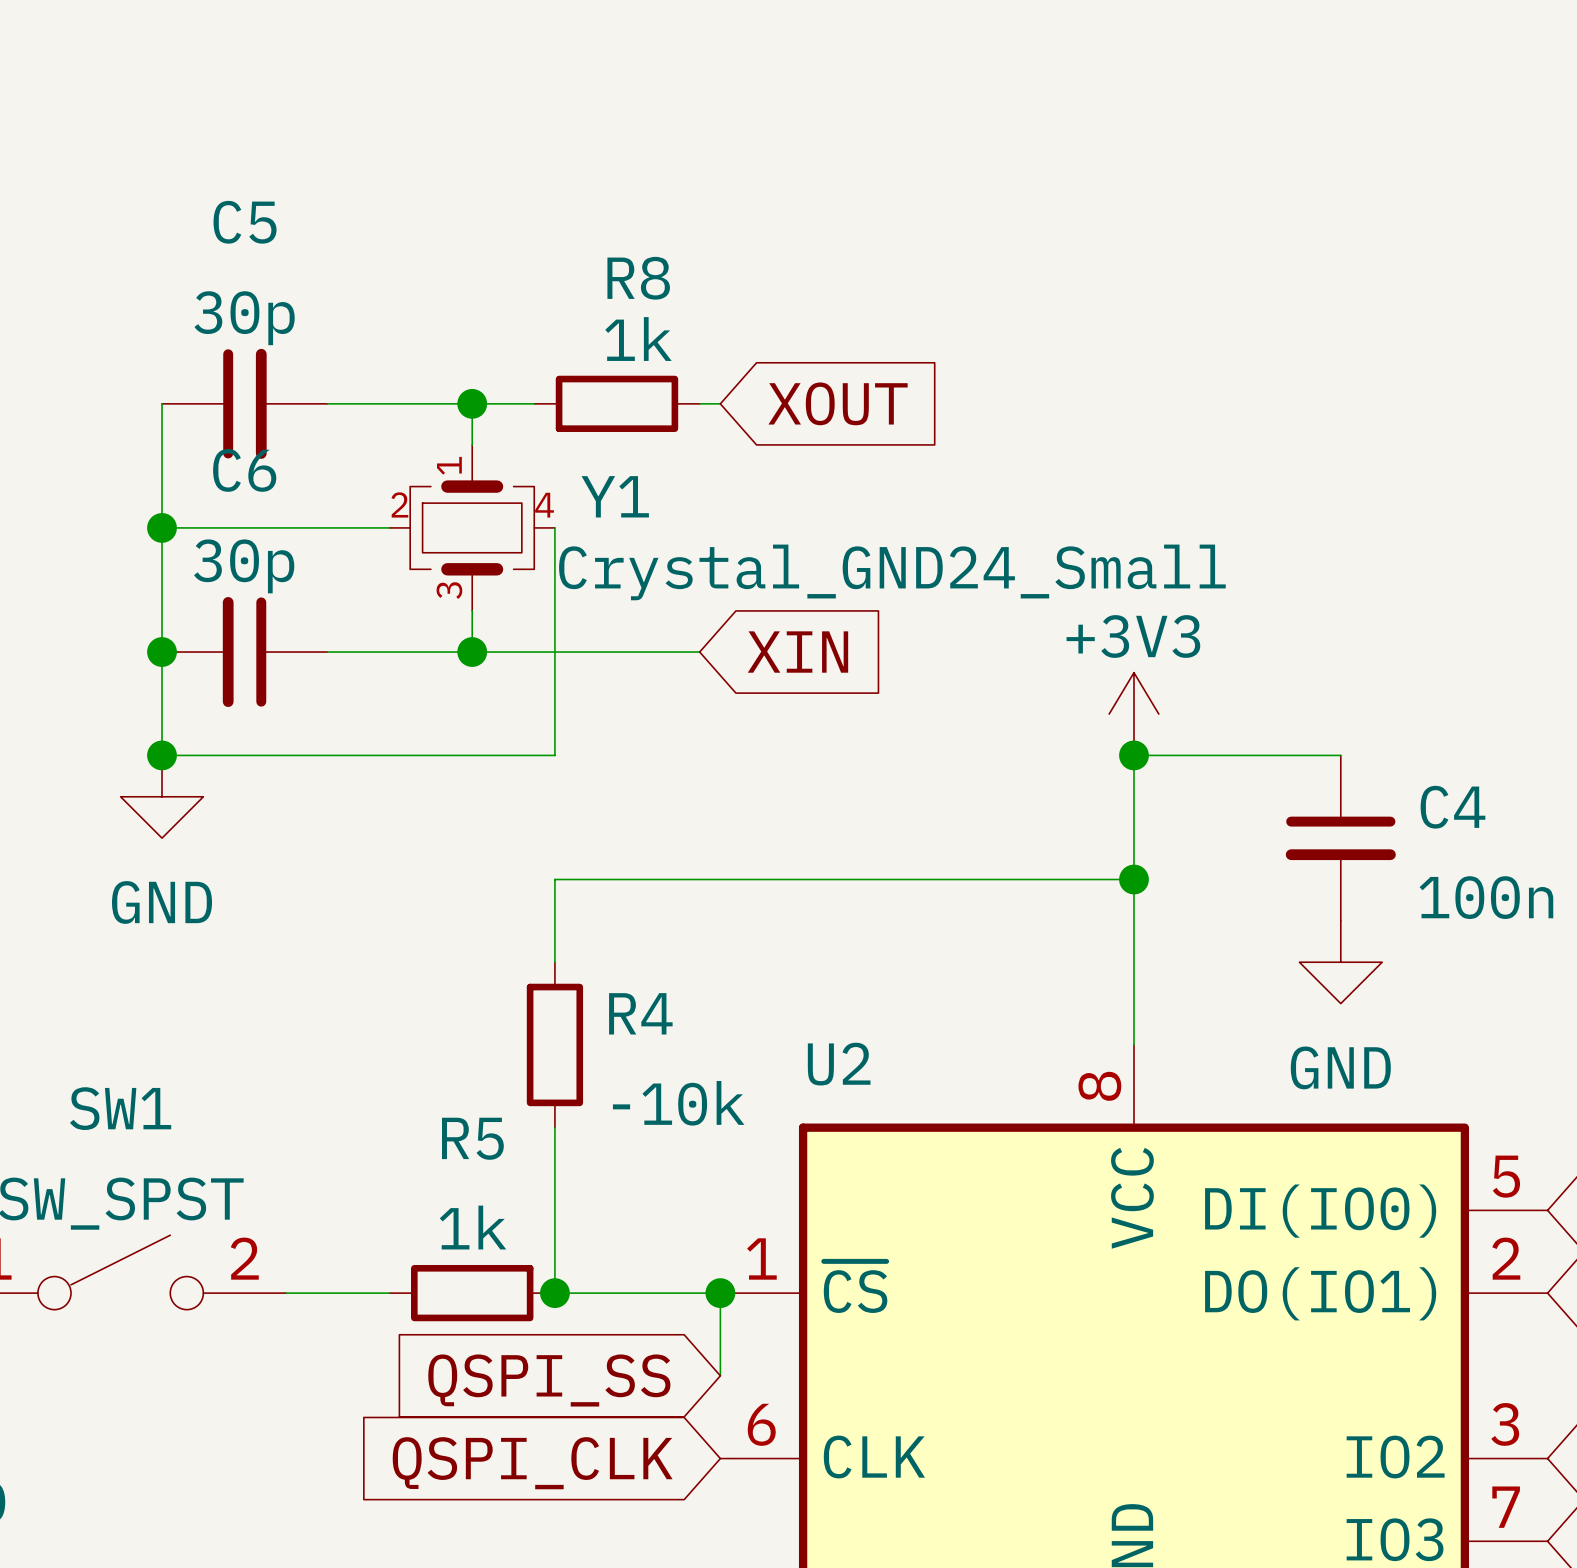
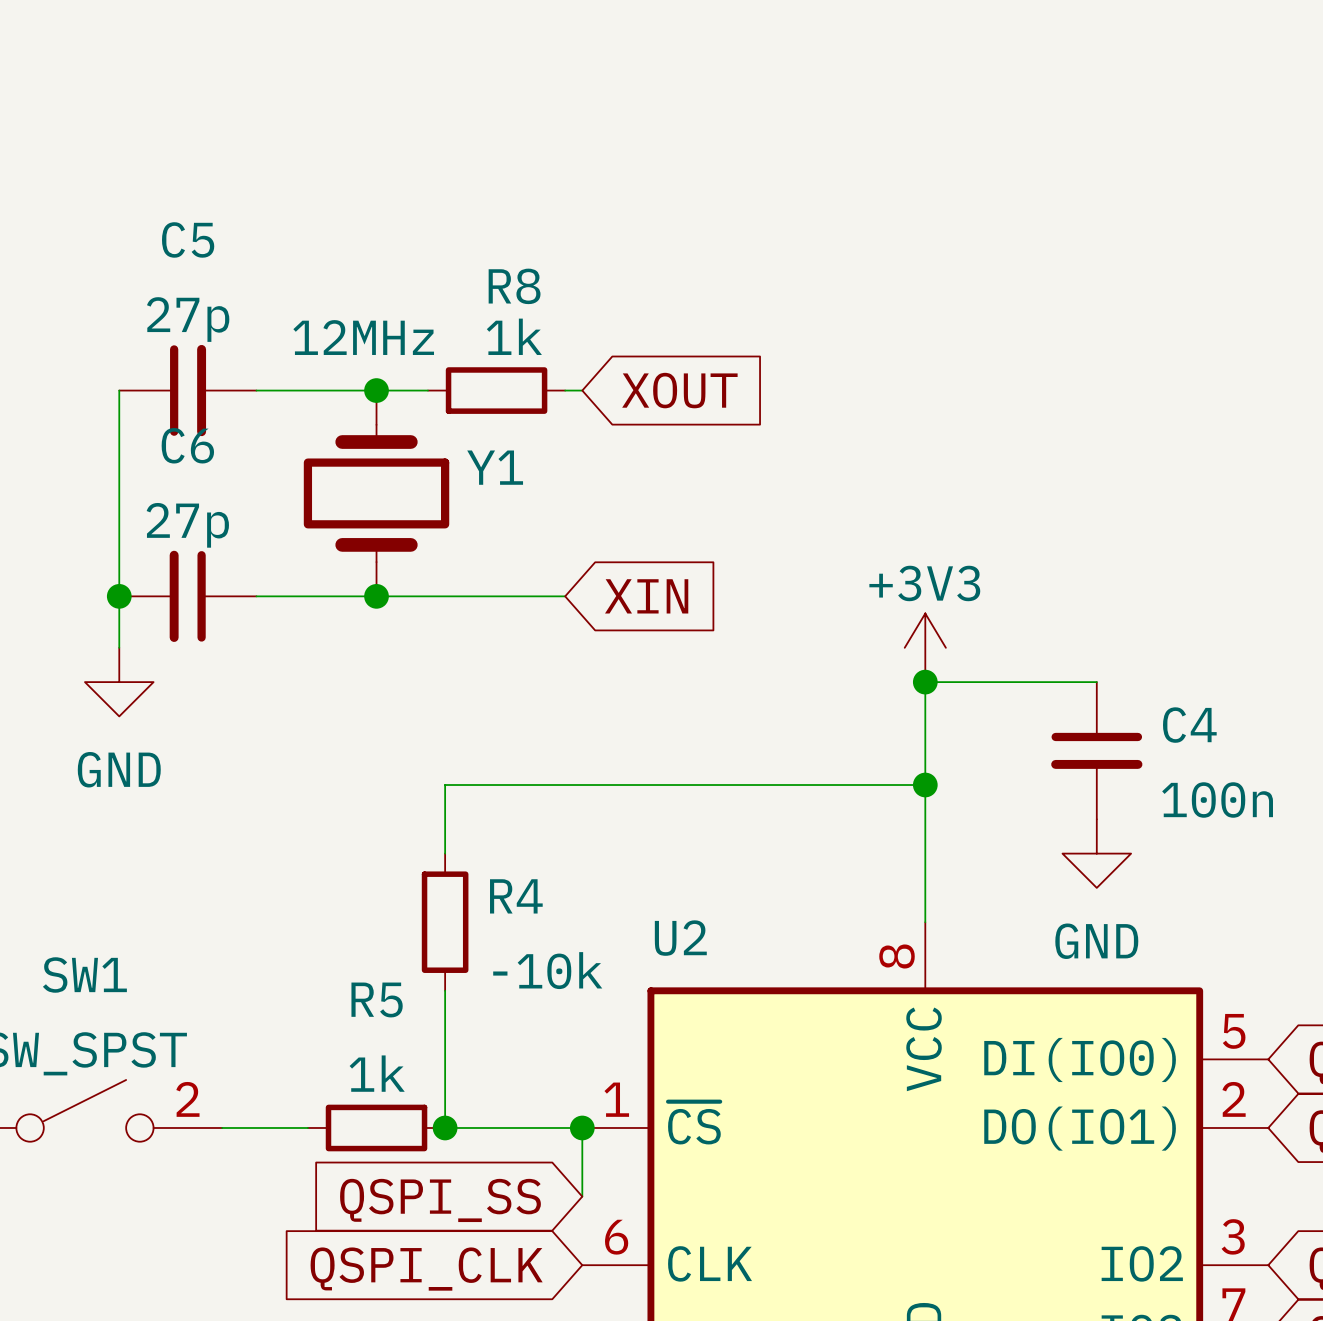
C5 value: 30p (244, 318) -> 27p (188, 319)
Y1 symbol: [389, 445, 555, 611] -> [303, 390, 450, 597]
wire: (162, 527) (389, 527) -> none
junction: (162, 527) -> none
wire: (554, 527) (554, 755) (162, 755) (162, 714) -> none
C6 value: 30p (244, 566) -> 27p (187, 525)
Y1 value: Crystal_GND24_Small (892, 572) -> 12MHz (363, 337)
junction: (162, 755) -> none
power symbol position: GND (162, 796) -> GND (119, 682)

